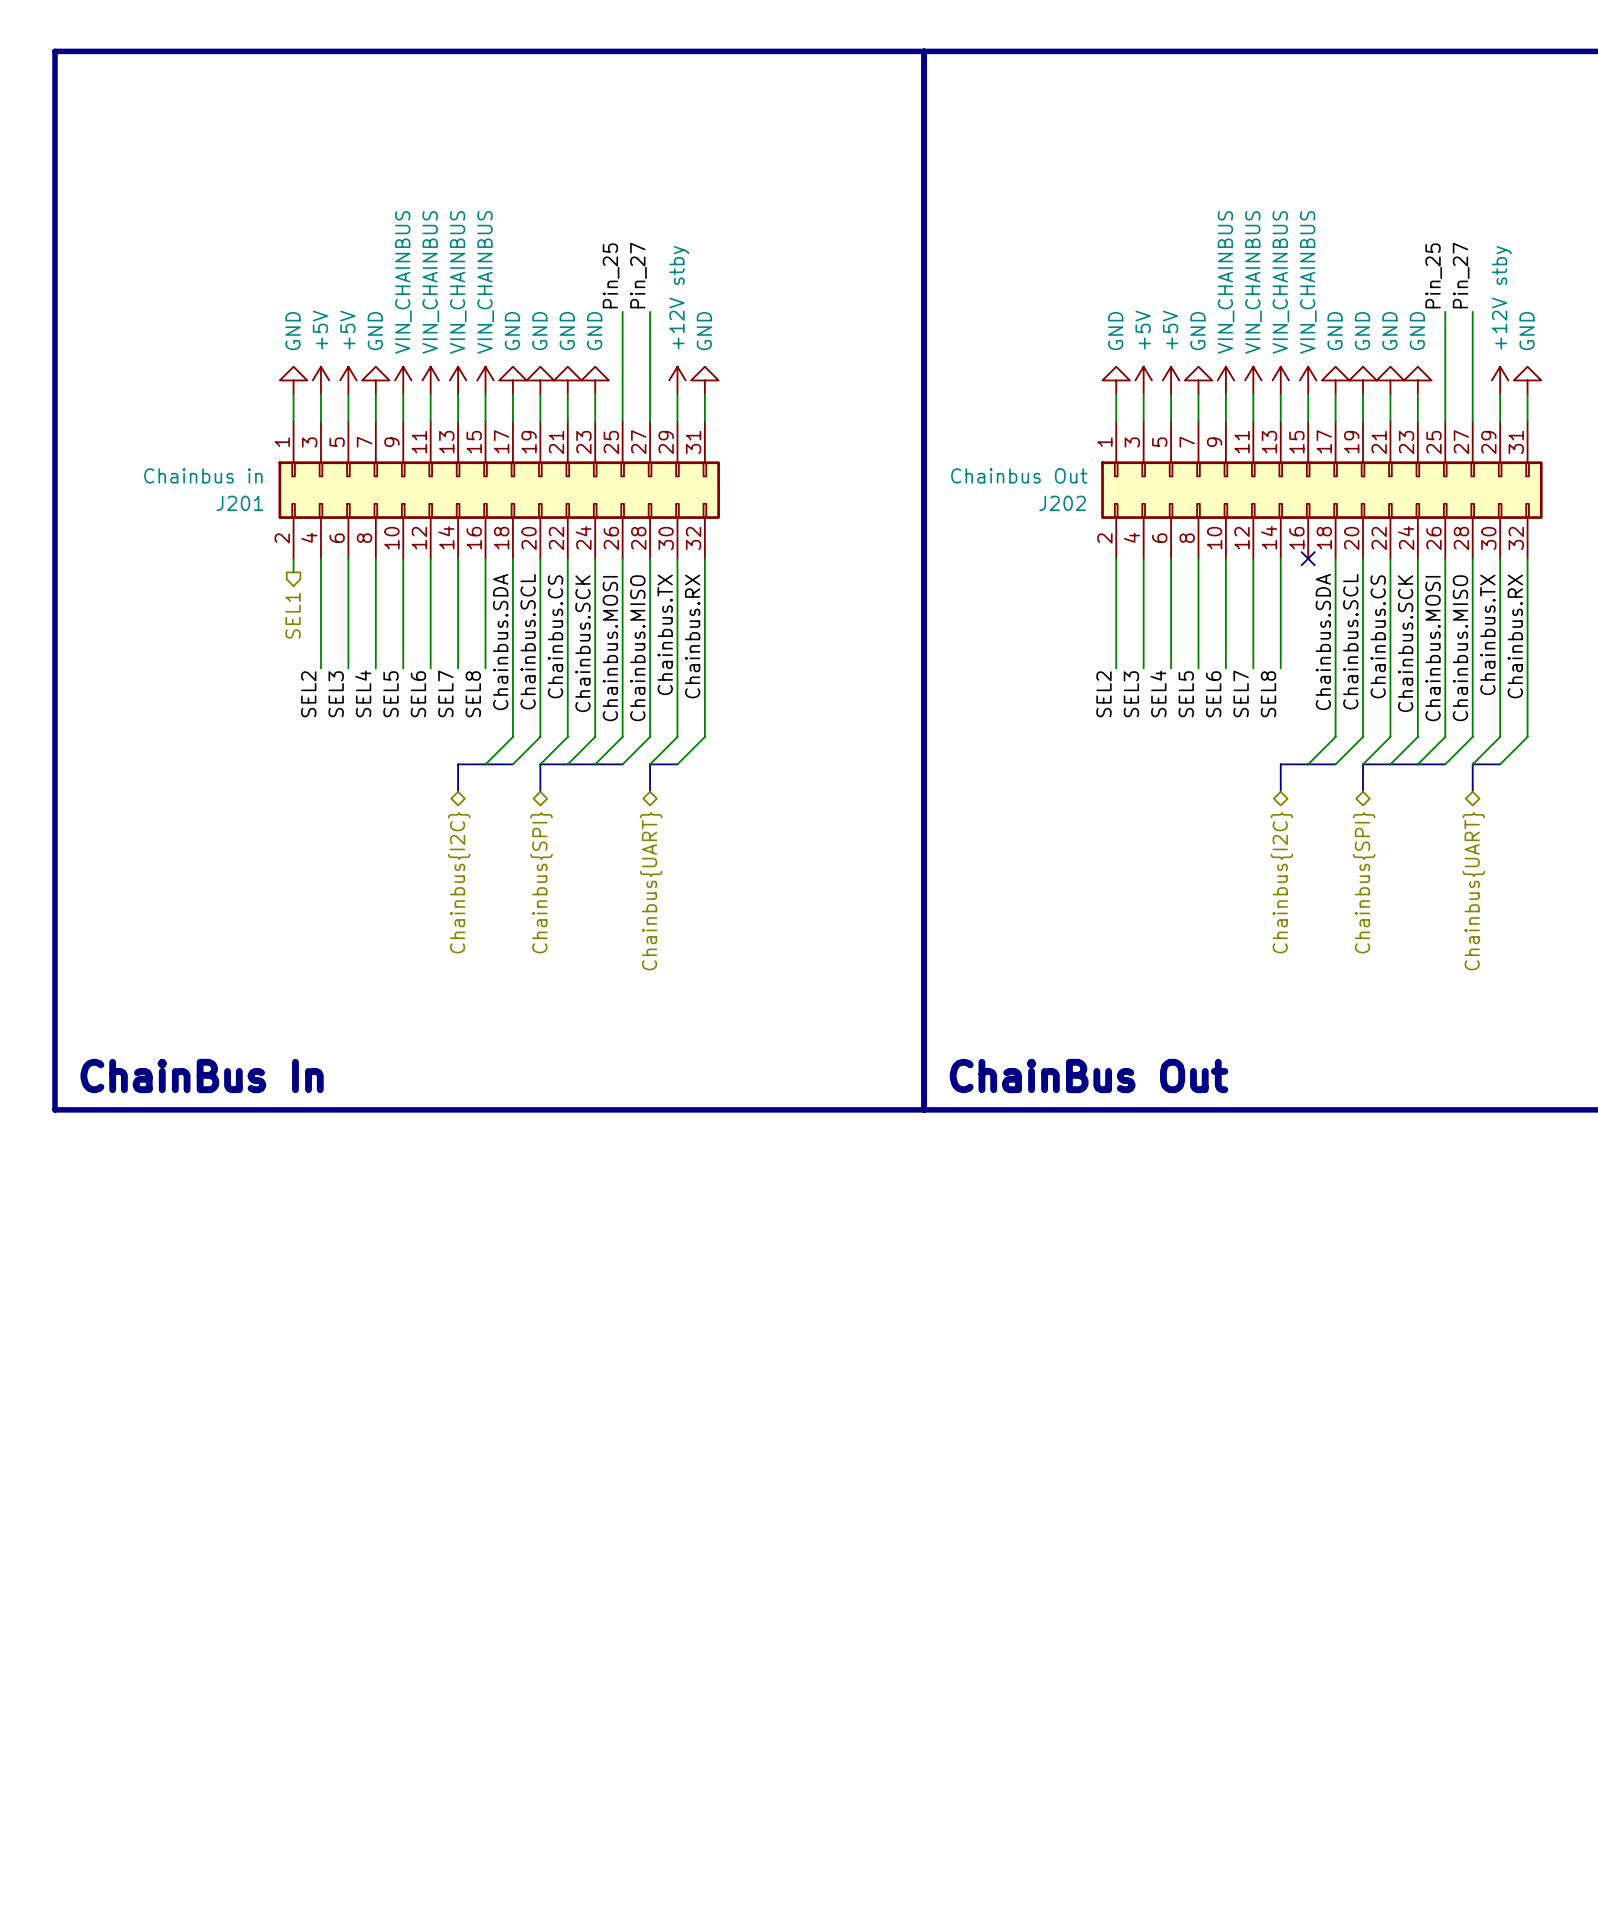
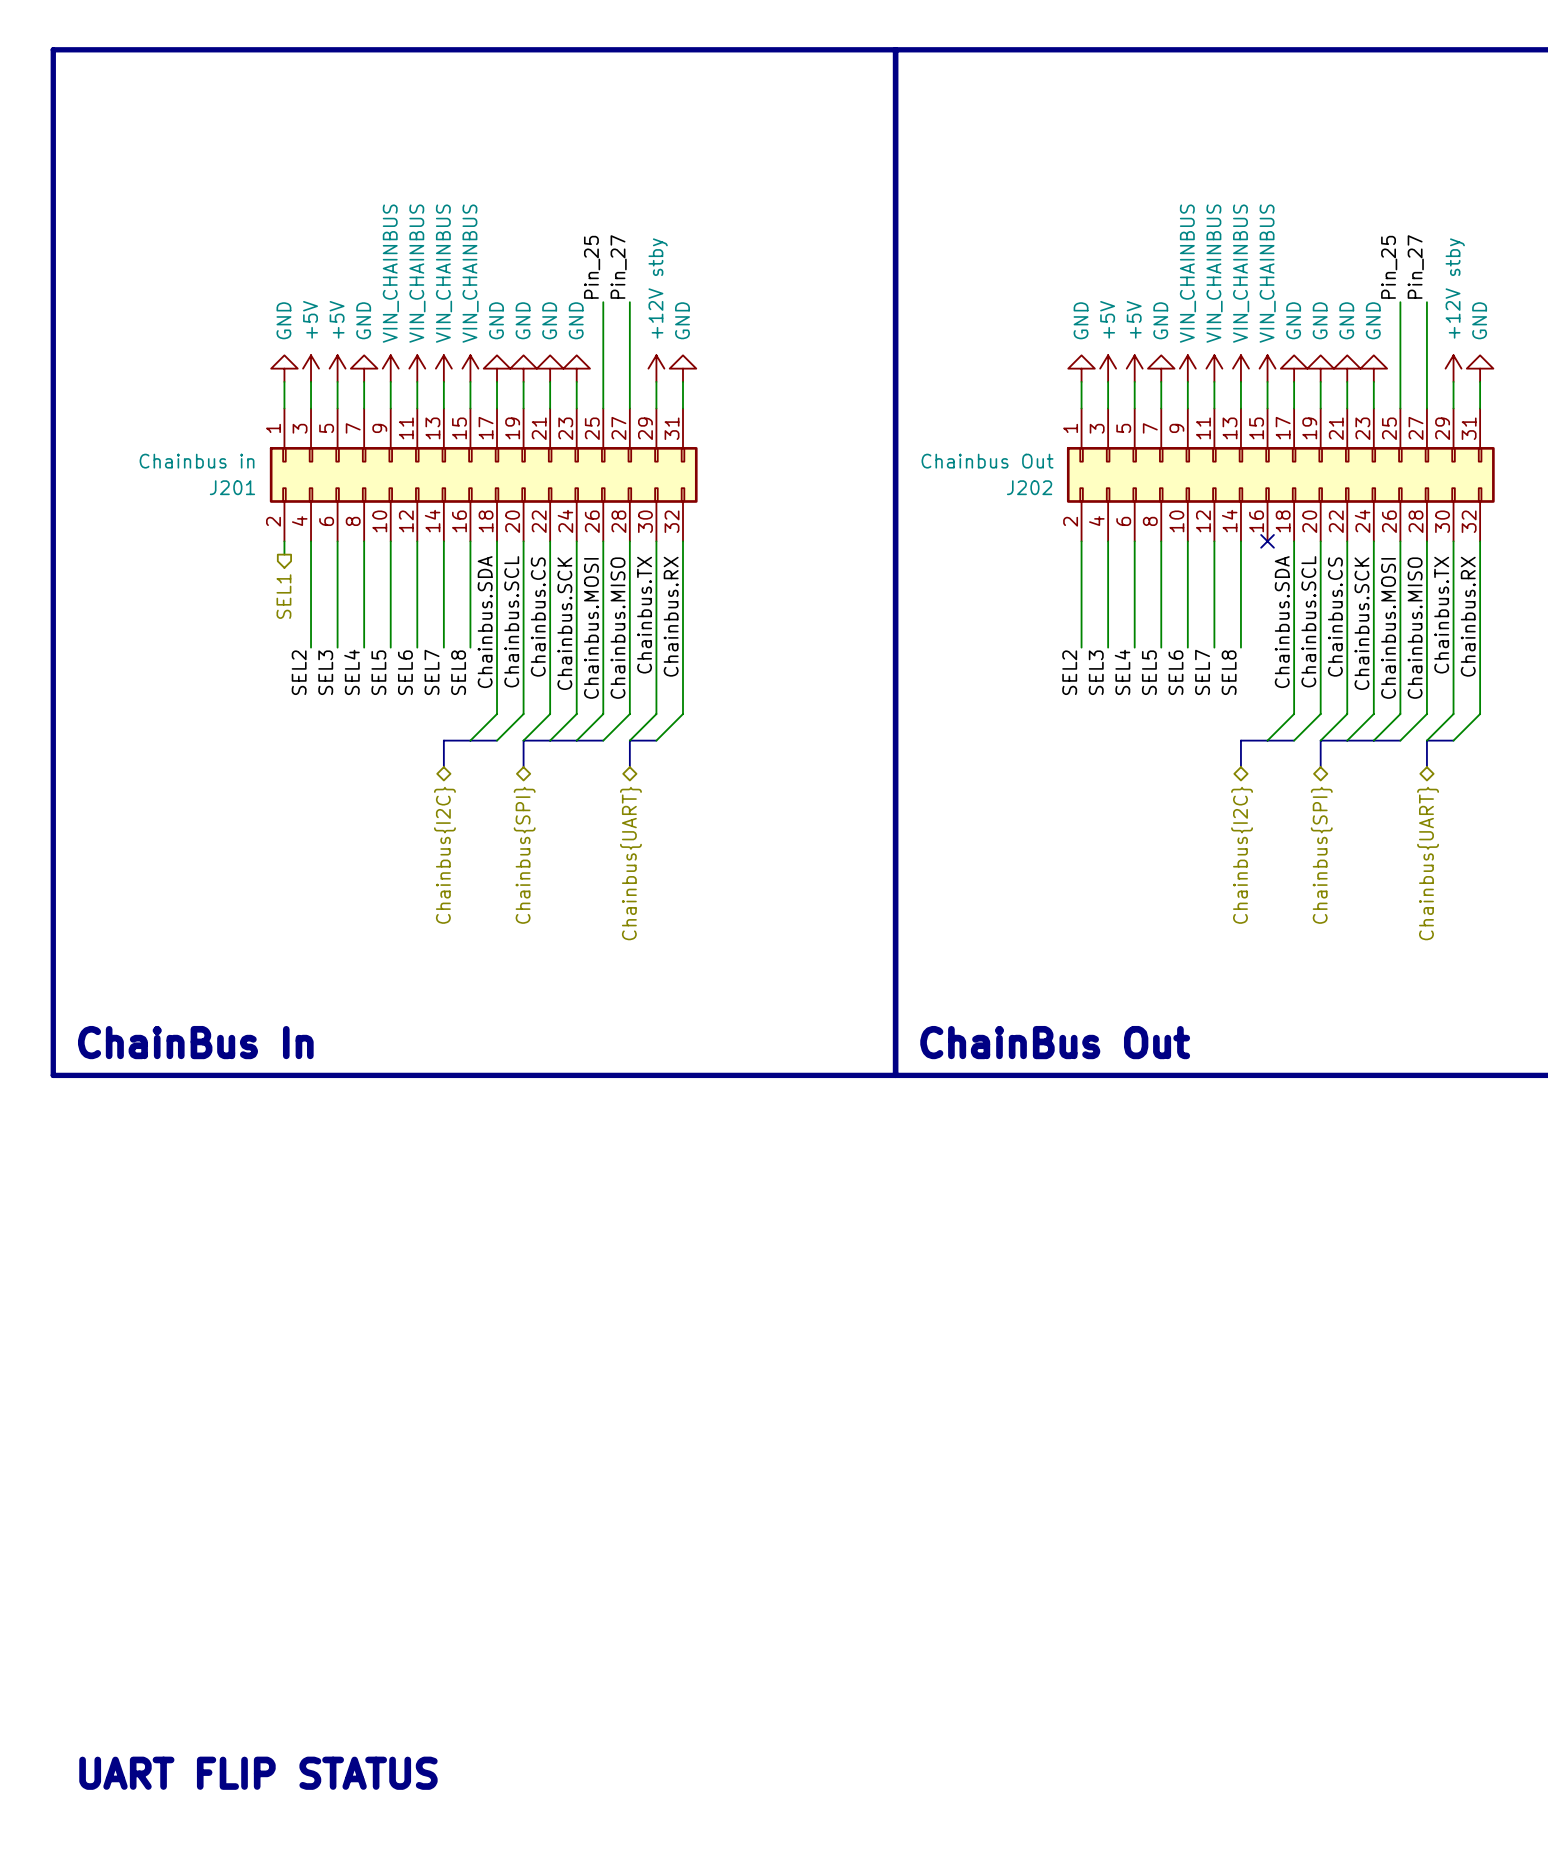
text: none -> UART FLIP STATUS (258, 1773)

